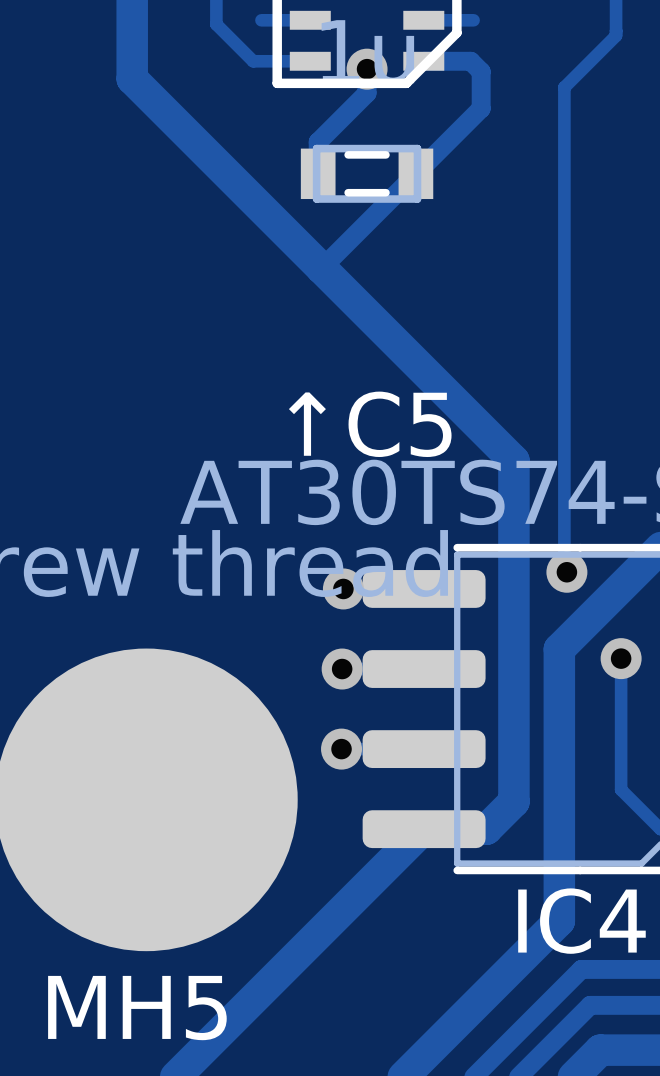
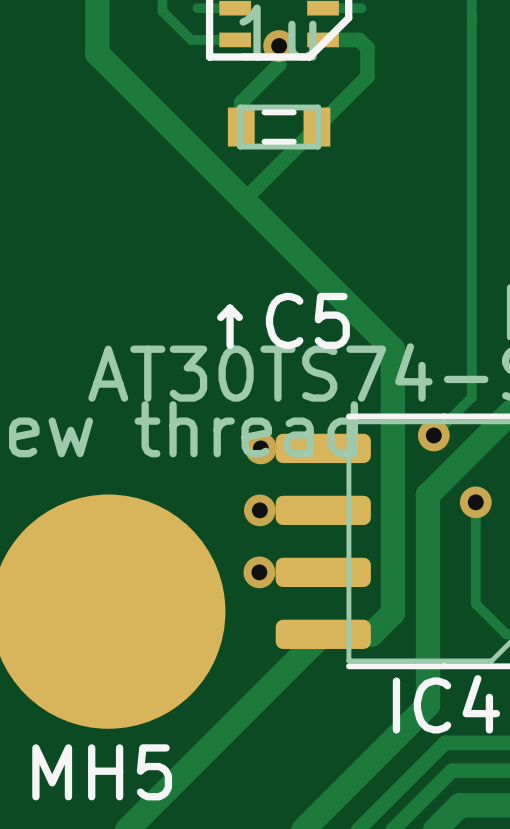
track: (616, 35) (564, 87) (564, 569) (566, 572) -> (471, 20) (471, 397) (433, 435)

